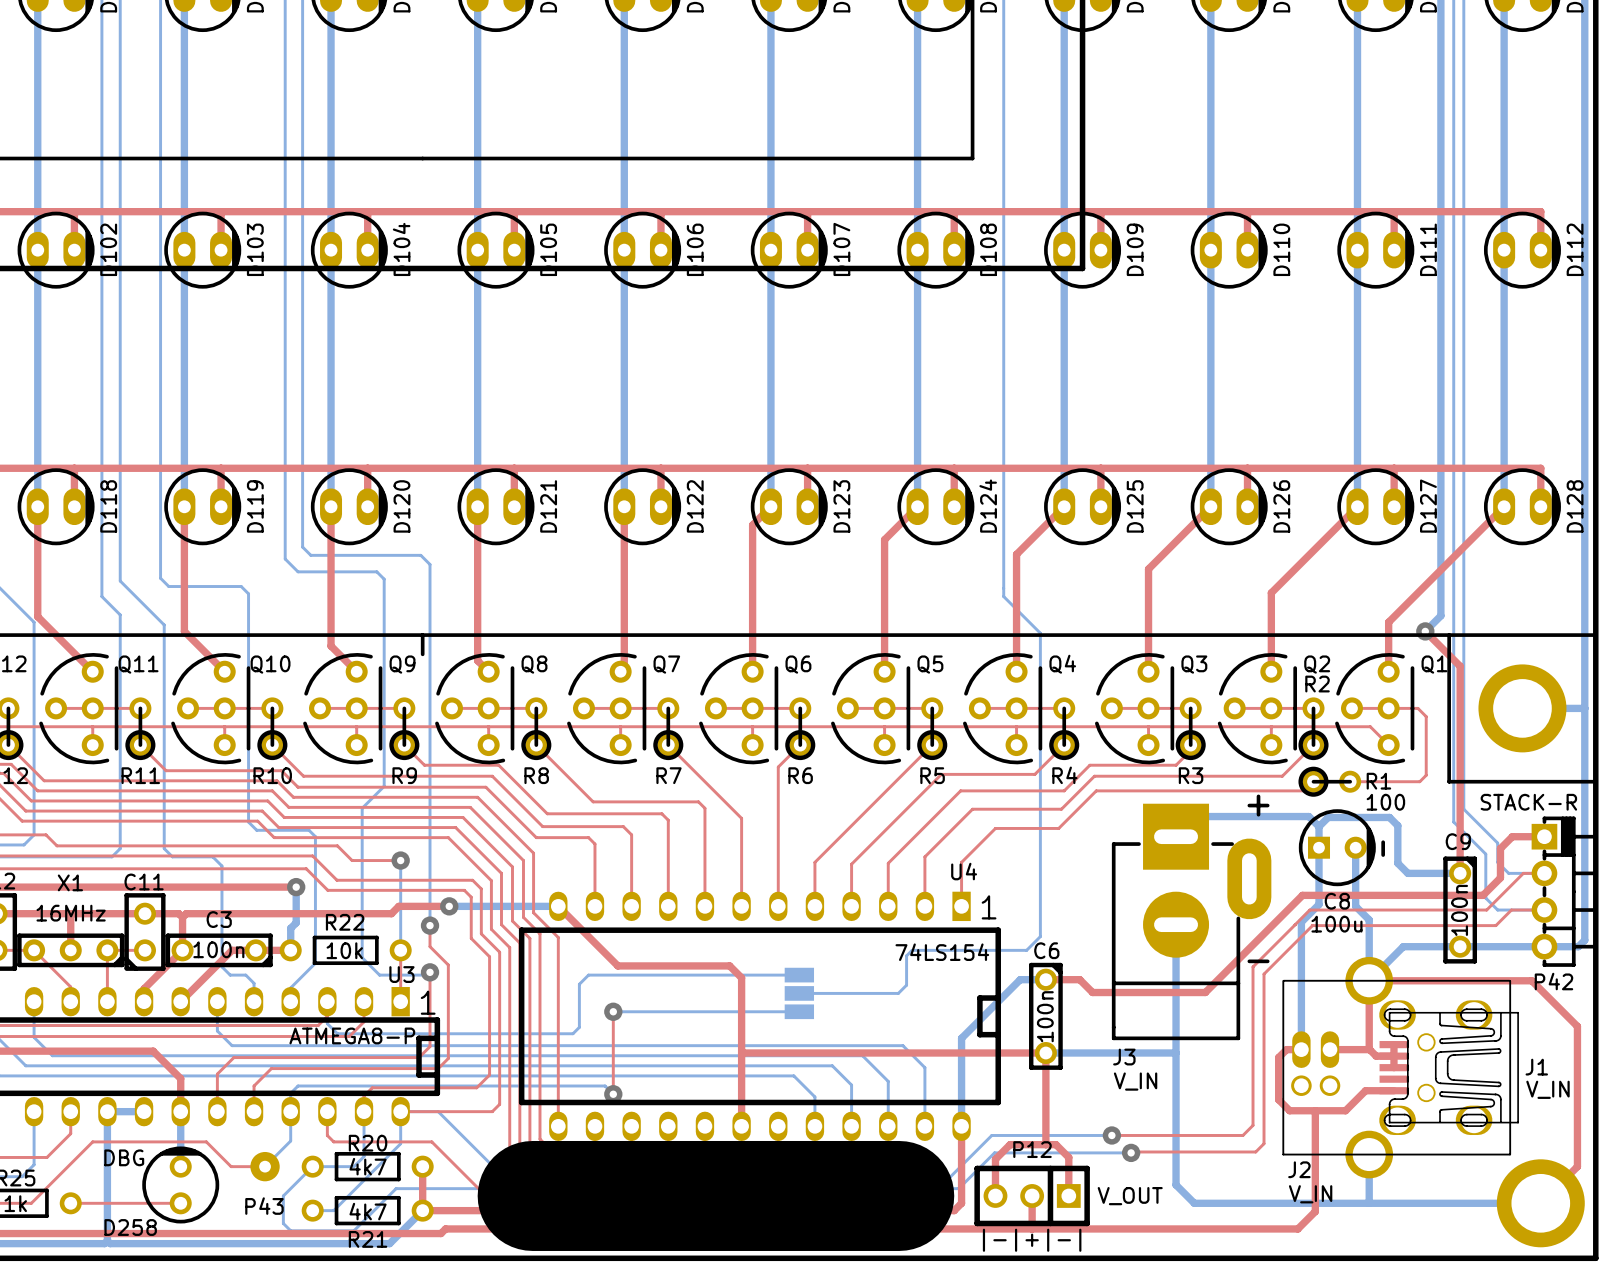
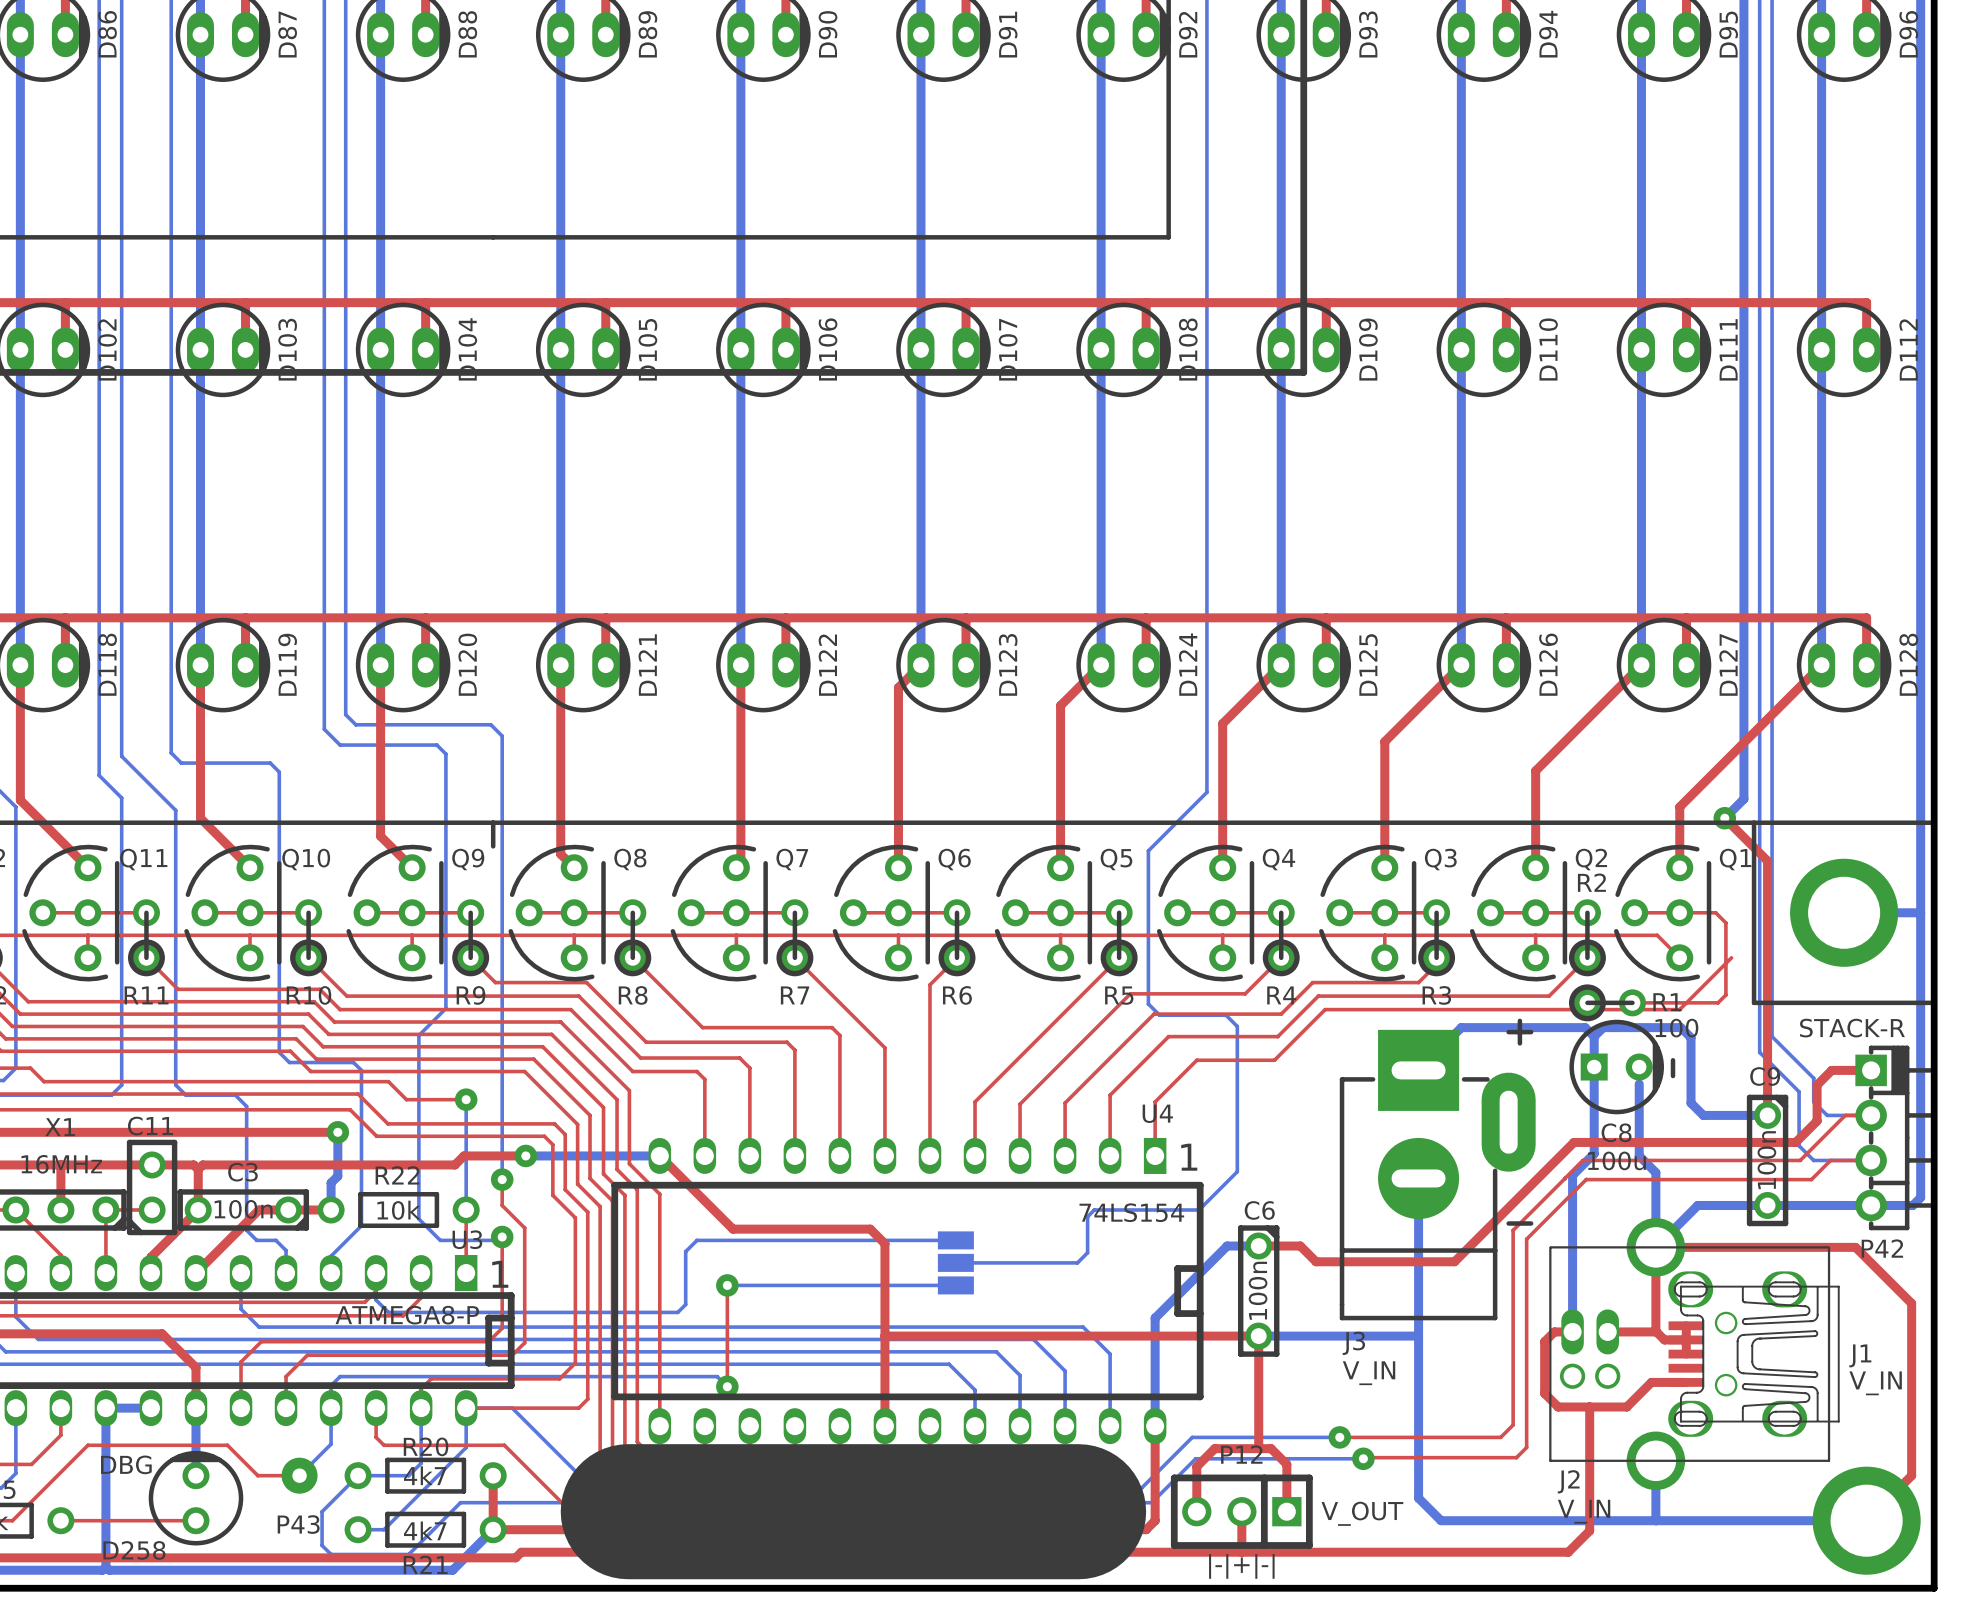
bottom track: (1003, 596) (1040, 633) (1040, 936) (1026, 950) (997, 950) -> (1206, 775) (1206, 792) (1148, 850) (1148, 1003) (1159, 1015) (1226, 1015) (1237, 1026) (1237, 1171) (1199, 1209)
top track: (1313, 781) (1304, 790) (1096, 790) -> (1731, 957) (1679, 1009) (1325, 1009) (1320, 1014)
bottom track: none -> (1594, 1036) (1594, 1058)
bottom track: none -> (1594, 1036) (1603, 1027) (1680, 1027) (1691, 1037) (1691, 1056)
bottom track: (1196, 816) (1308, 816) (1319, 826) (1328, 817) (1389, 817) (1397, 825) -> (1443, 1045) (1461, 1027) (1585, 1027) (1594, 1036)
C8 position: (1341, 847) -> (1622, 1067)

